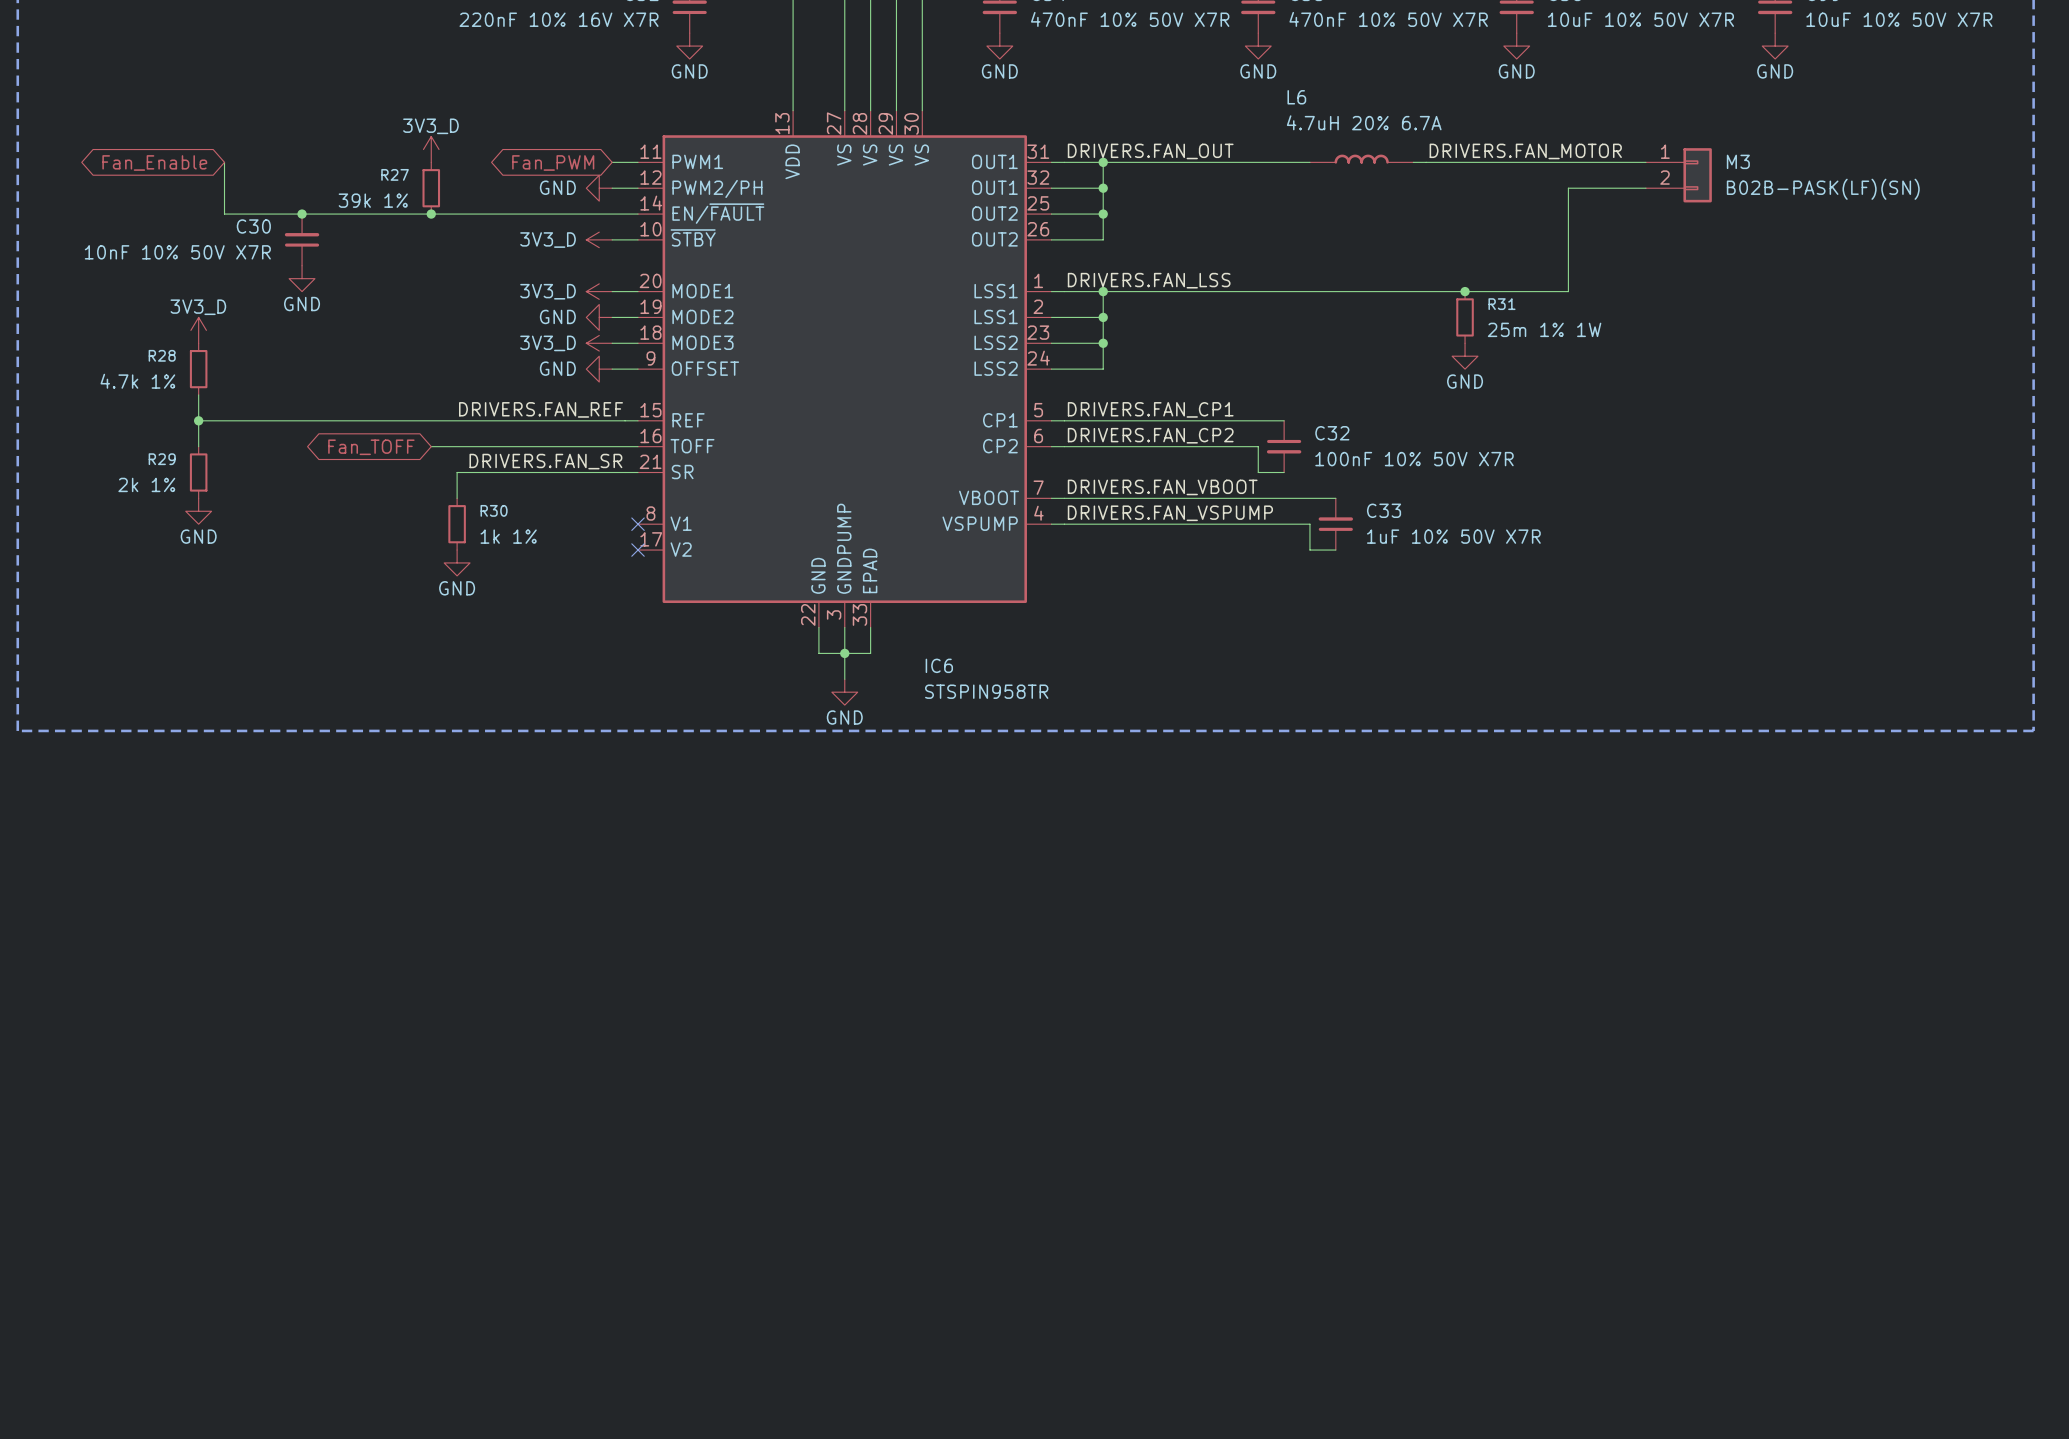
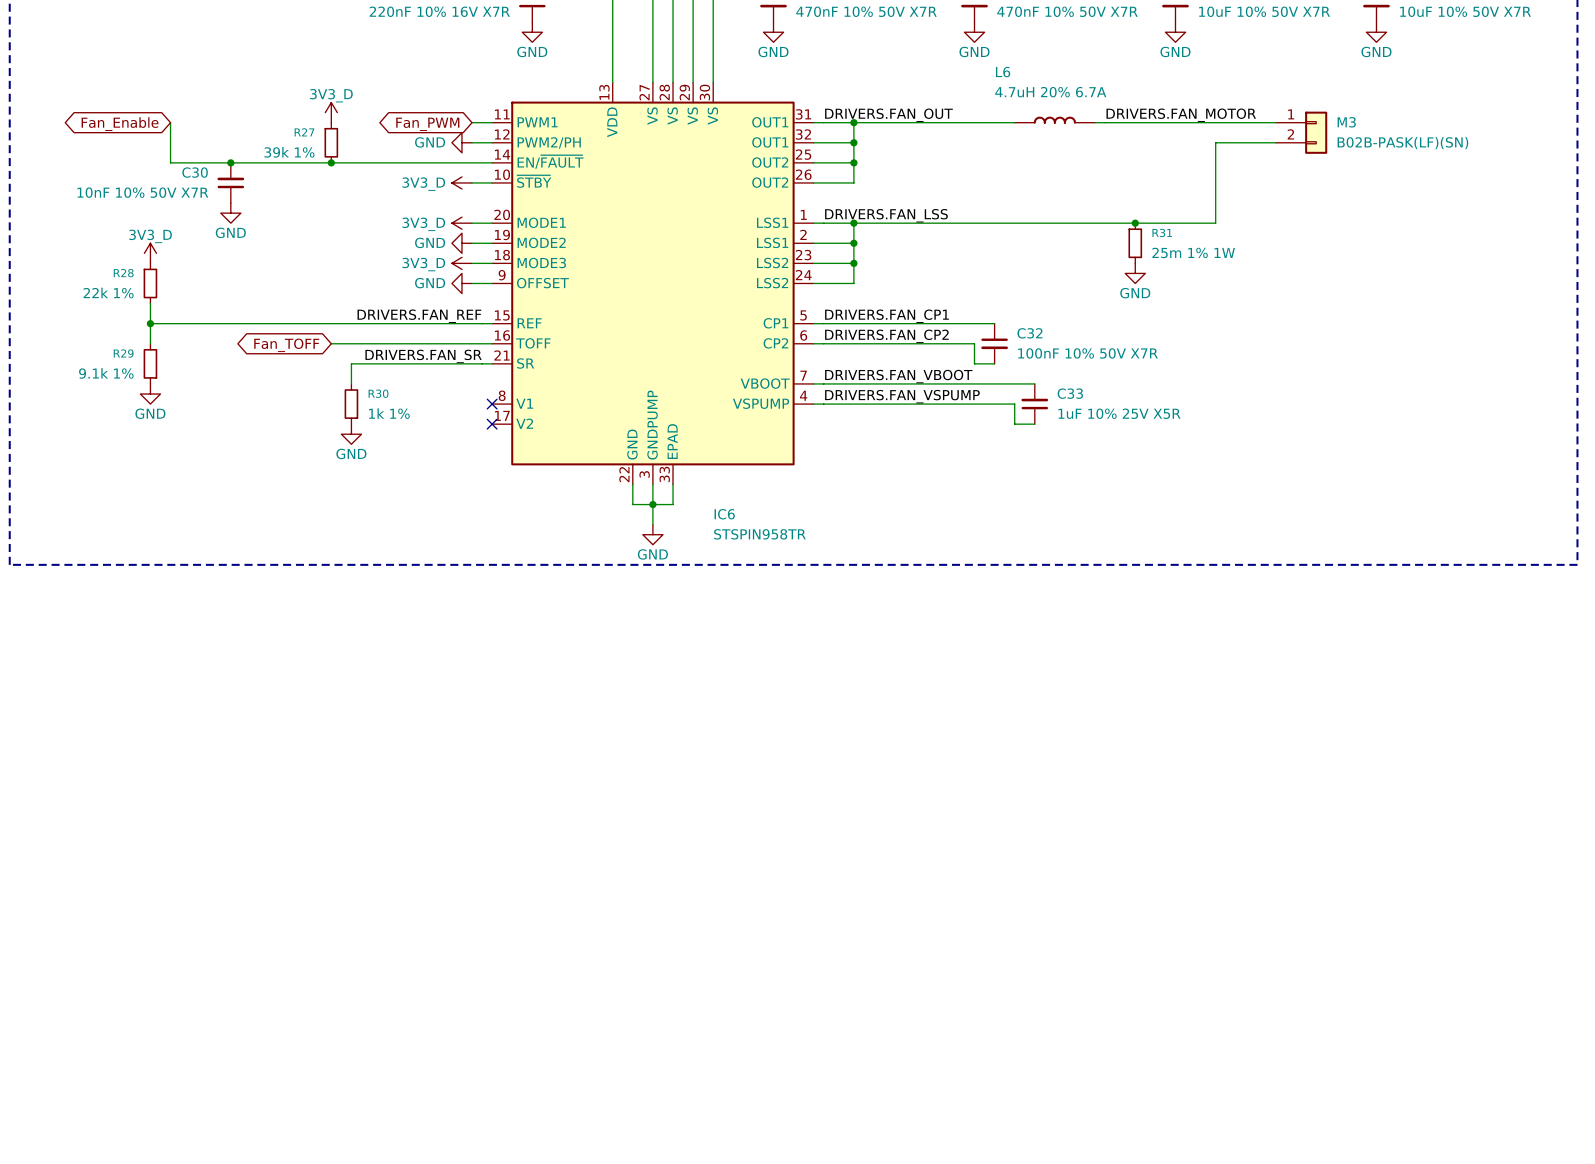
R28 value: 4.7k 1% (137, 381) -> 22k 1% (108, 293)
R29 value: 2k 1% (146, 484) -> 9.1k 1% (106, 373)
C33 value: 1uF 10% 50V X7R (1453, 536) -> 1uF 10% 25V X5R (1119, 413)

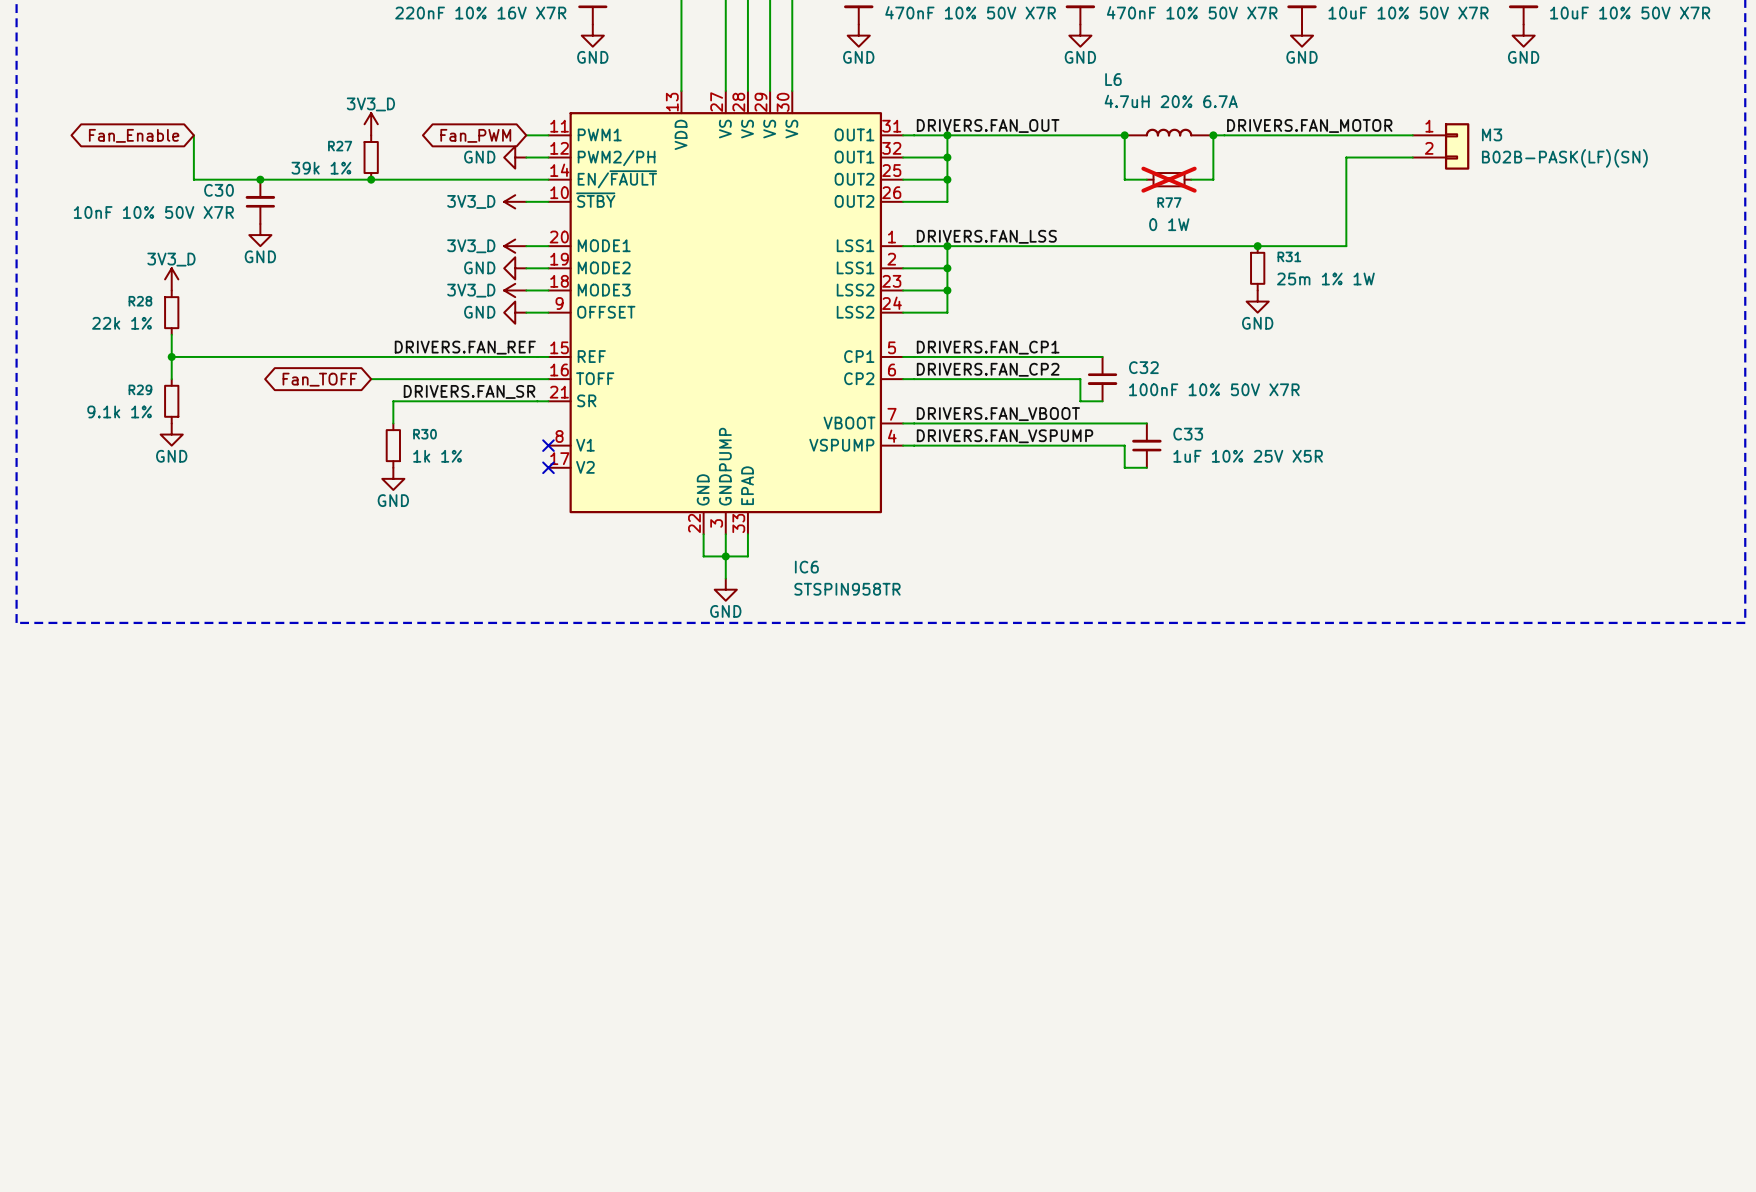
wire: none -> (1124, 135) (1124, 179) (1146, 179)
junction: none -> (1124, 135)
wire: none -> (1213, 135) (1213, 179) (1191, 179)
junction: none -> (1213, 135)
R77: none -> 0 1W (1169, 179)

